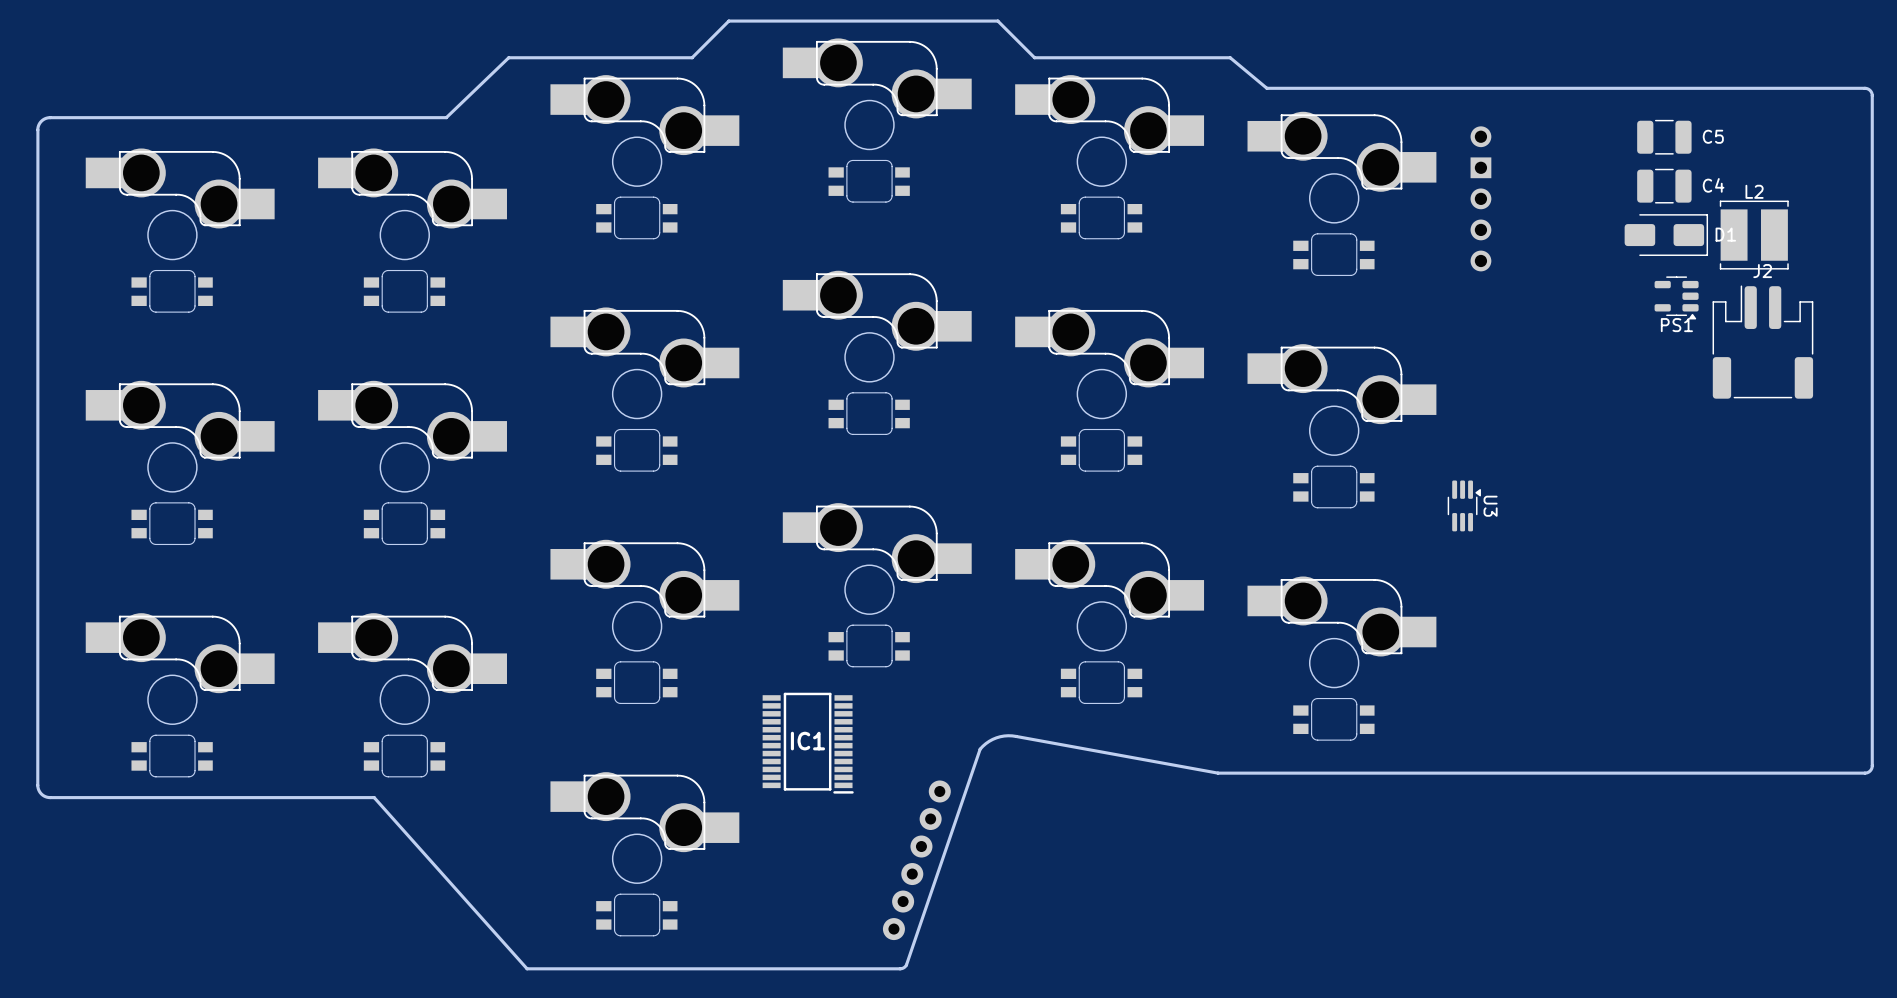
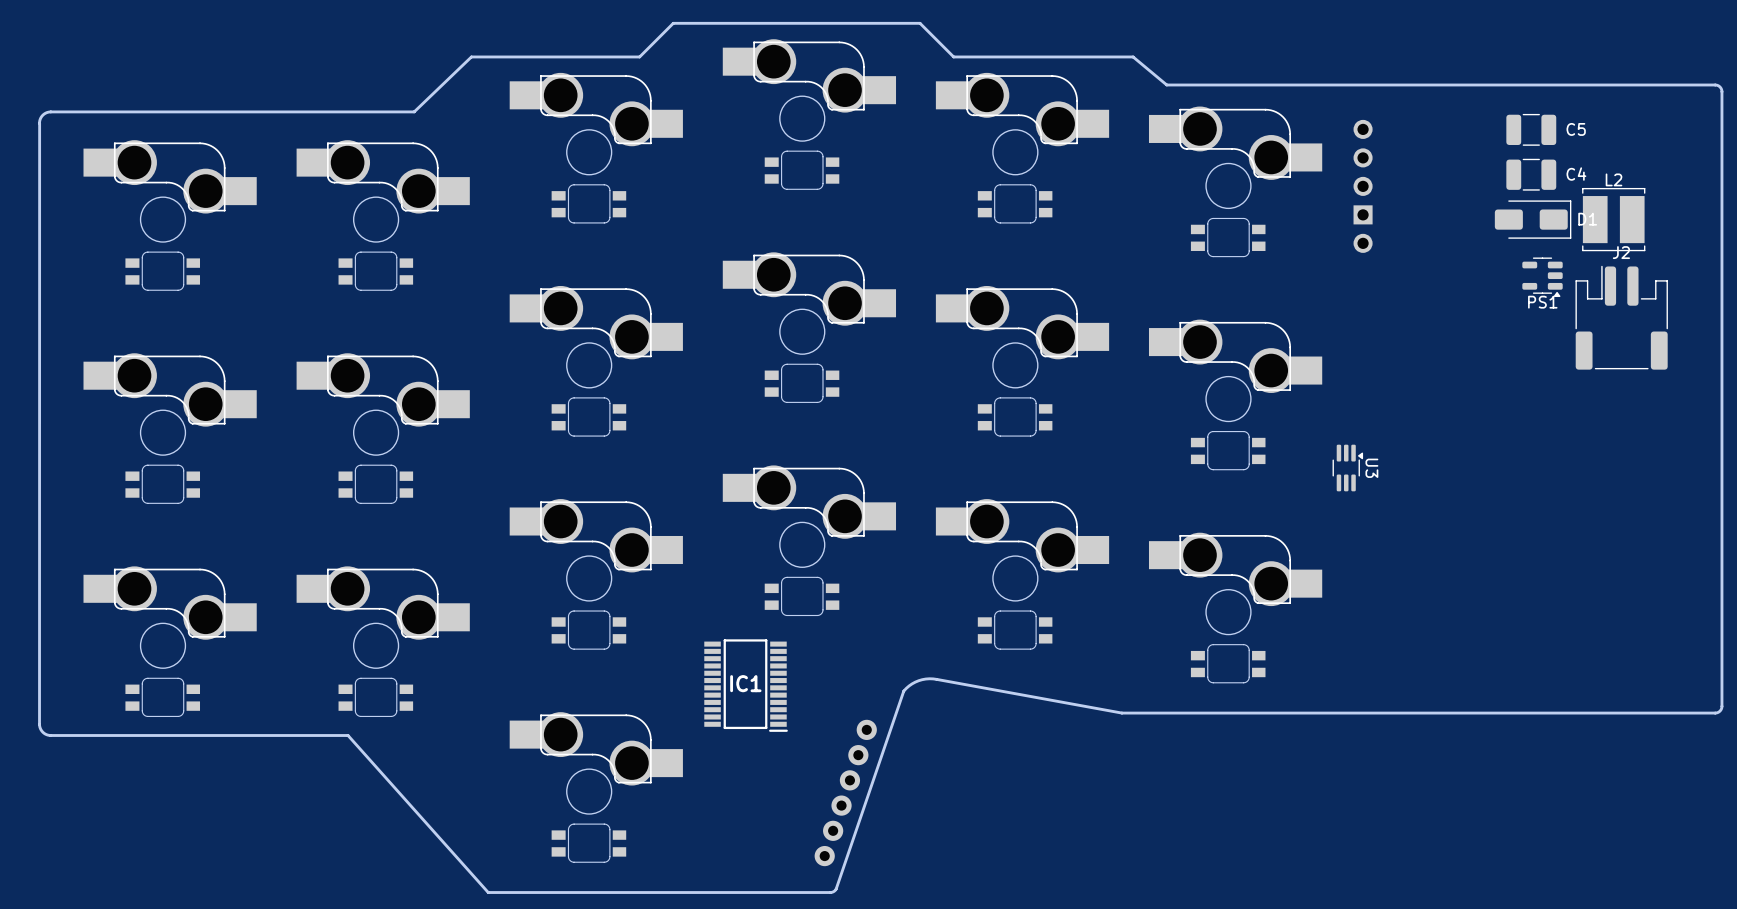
part rotation: 0° (1480, 198) -> 180° (1363, 186)

